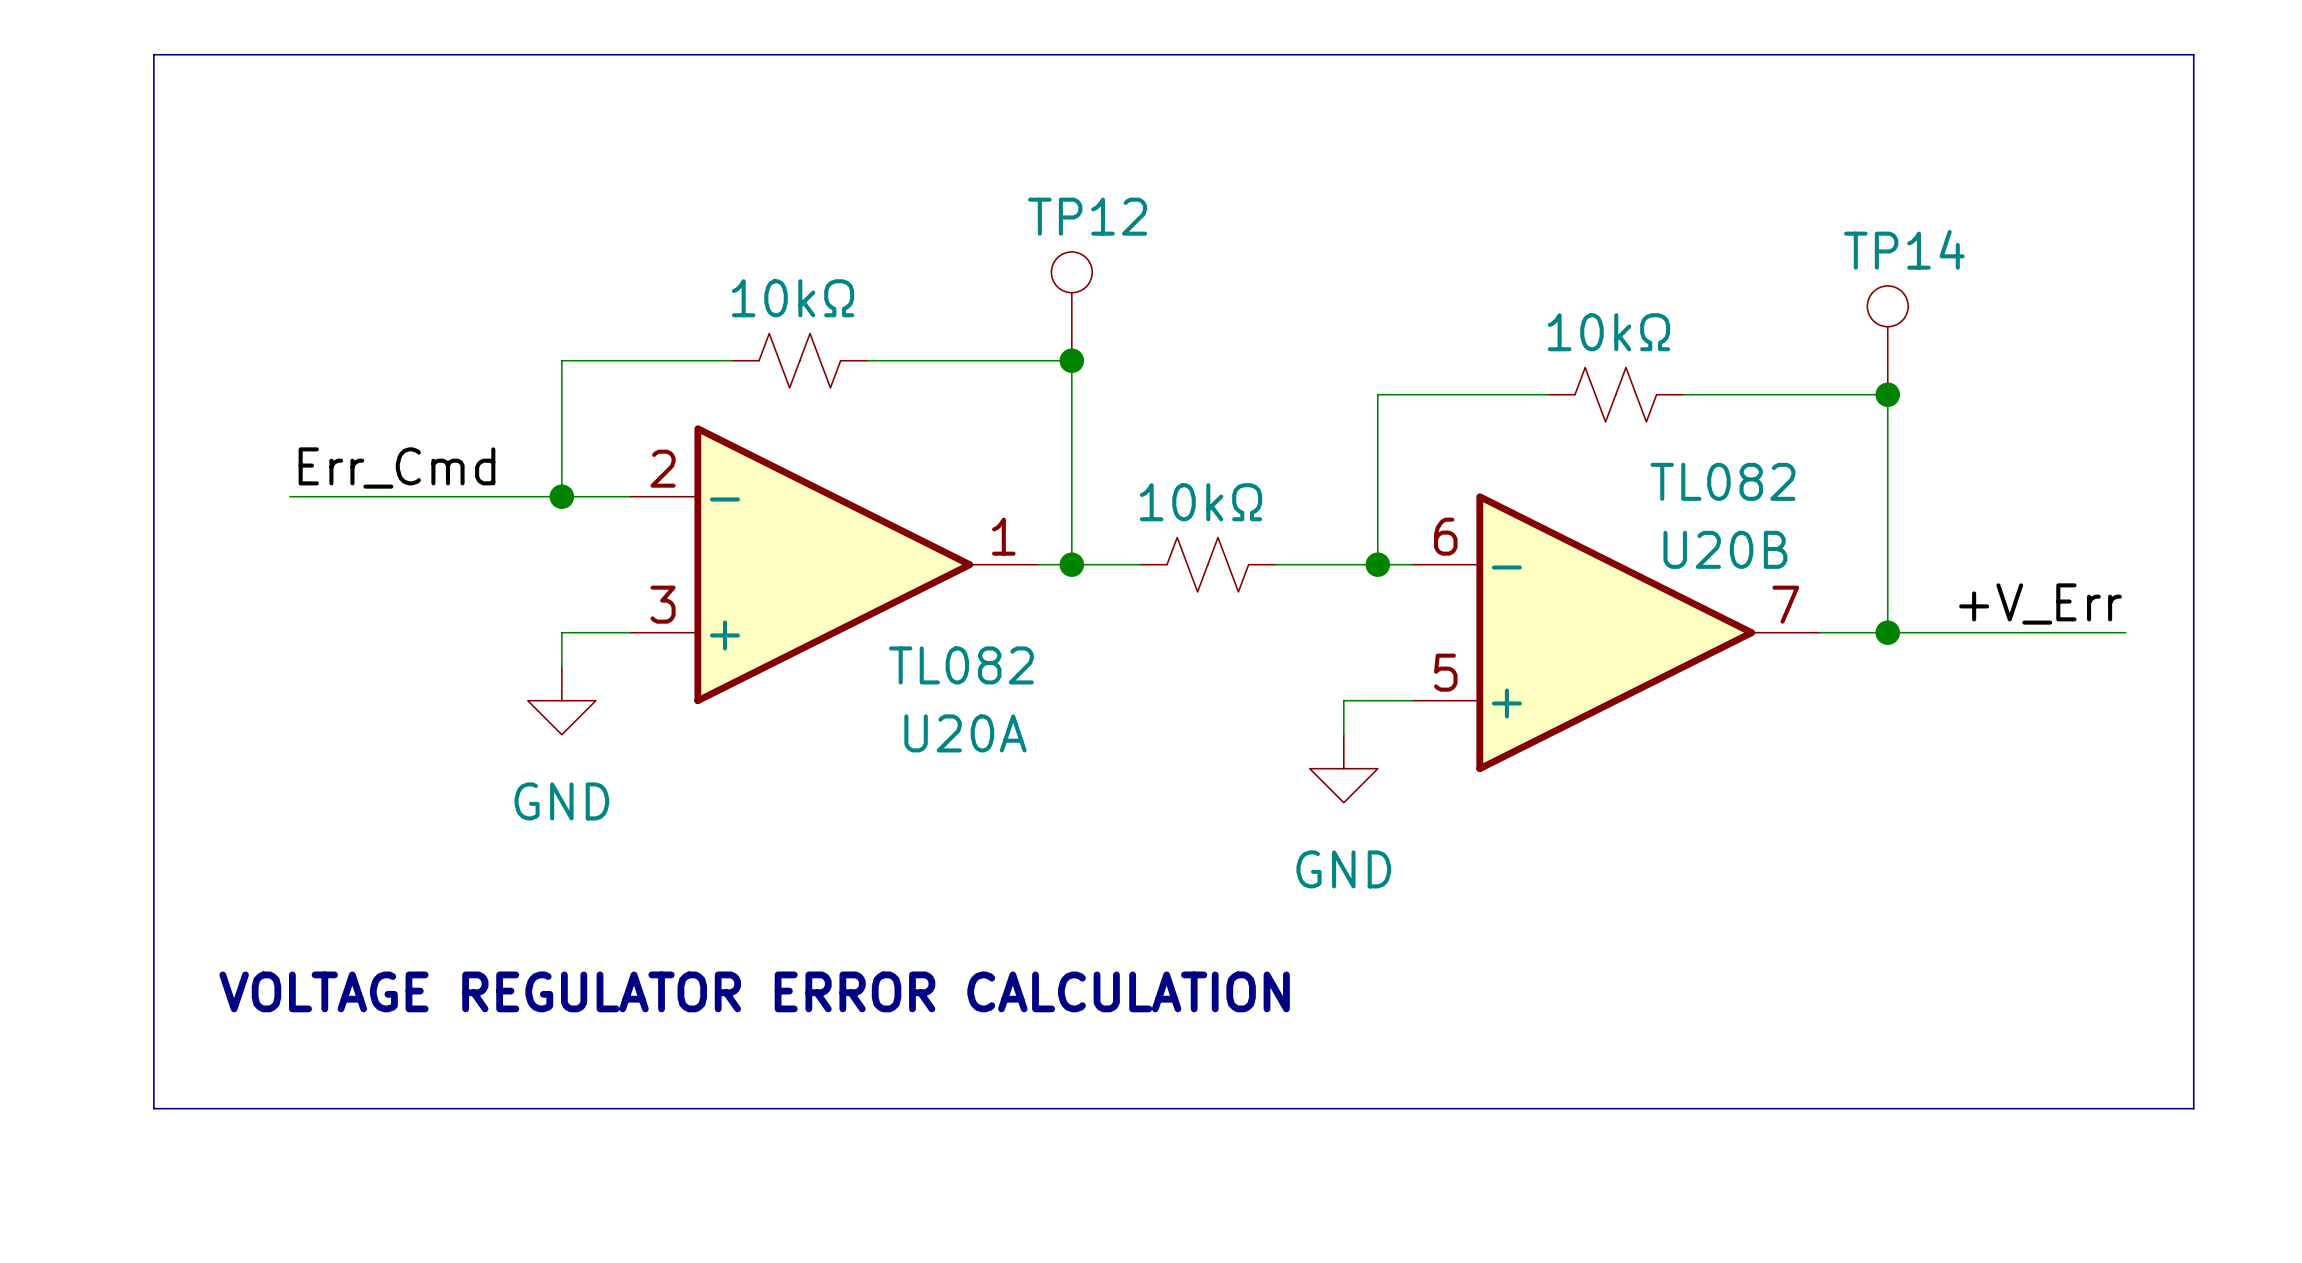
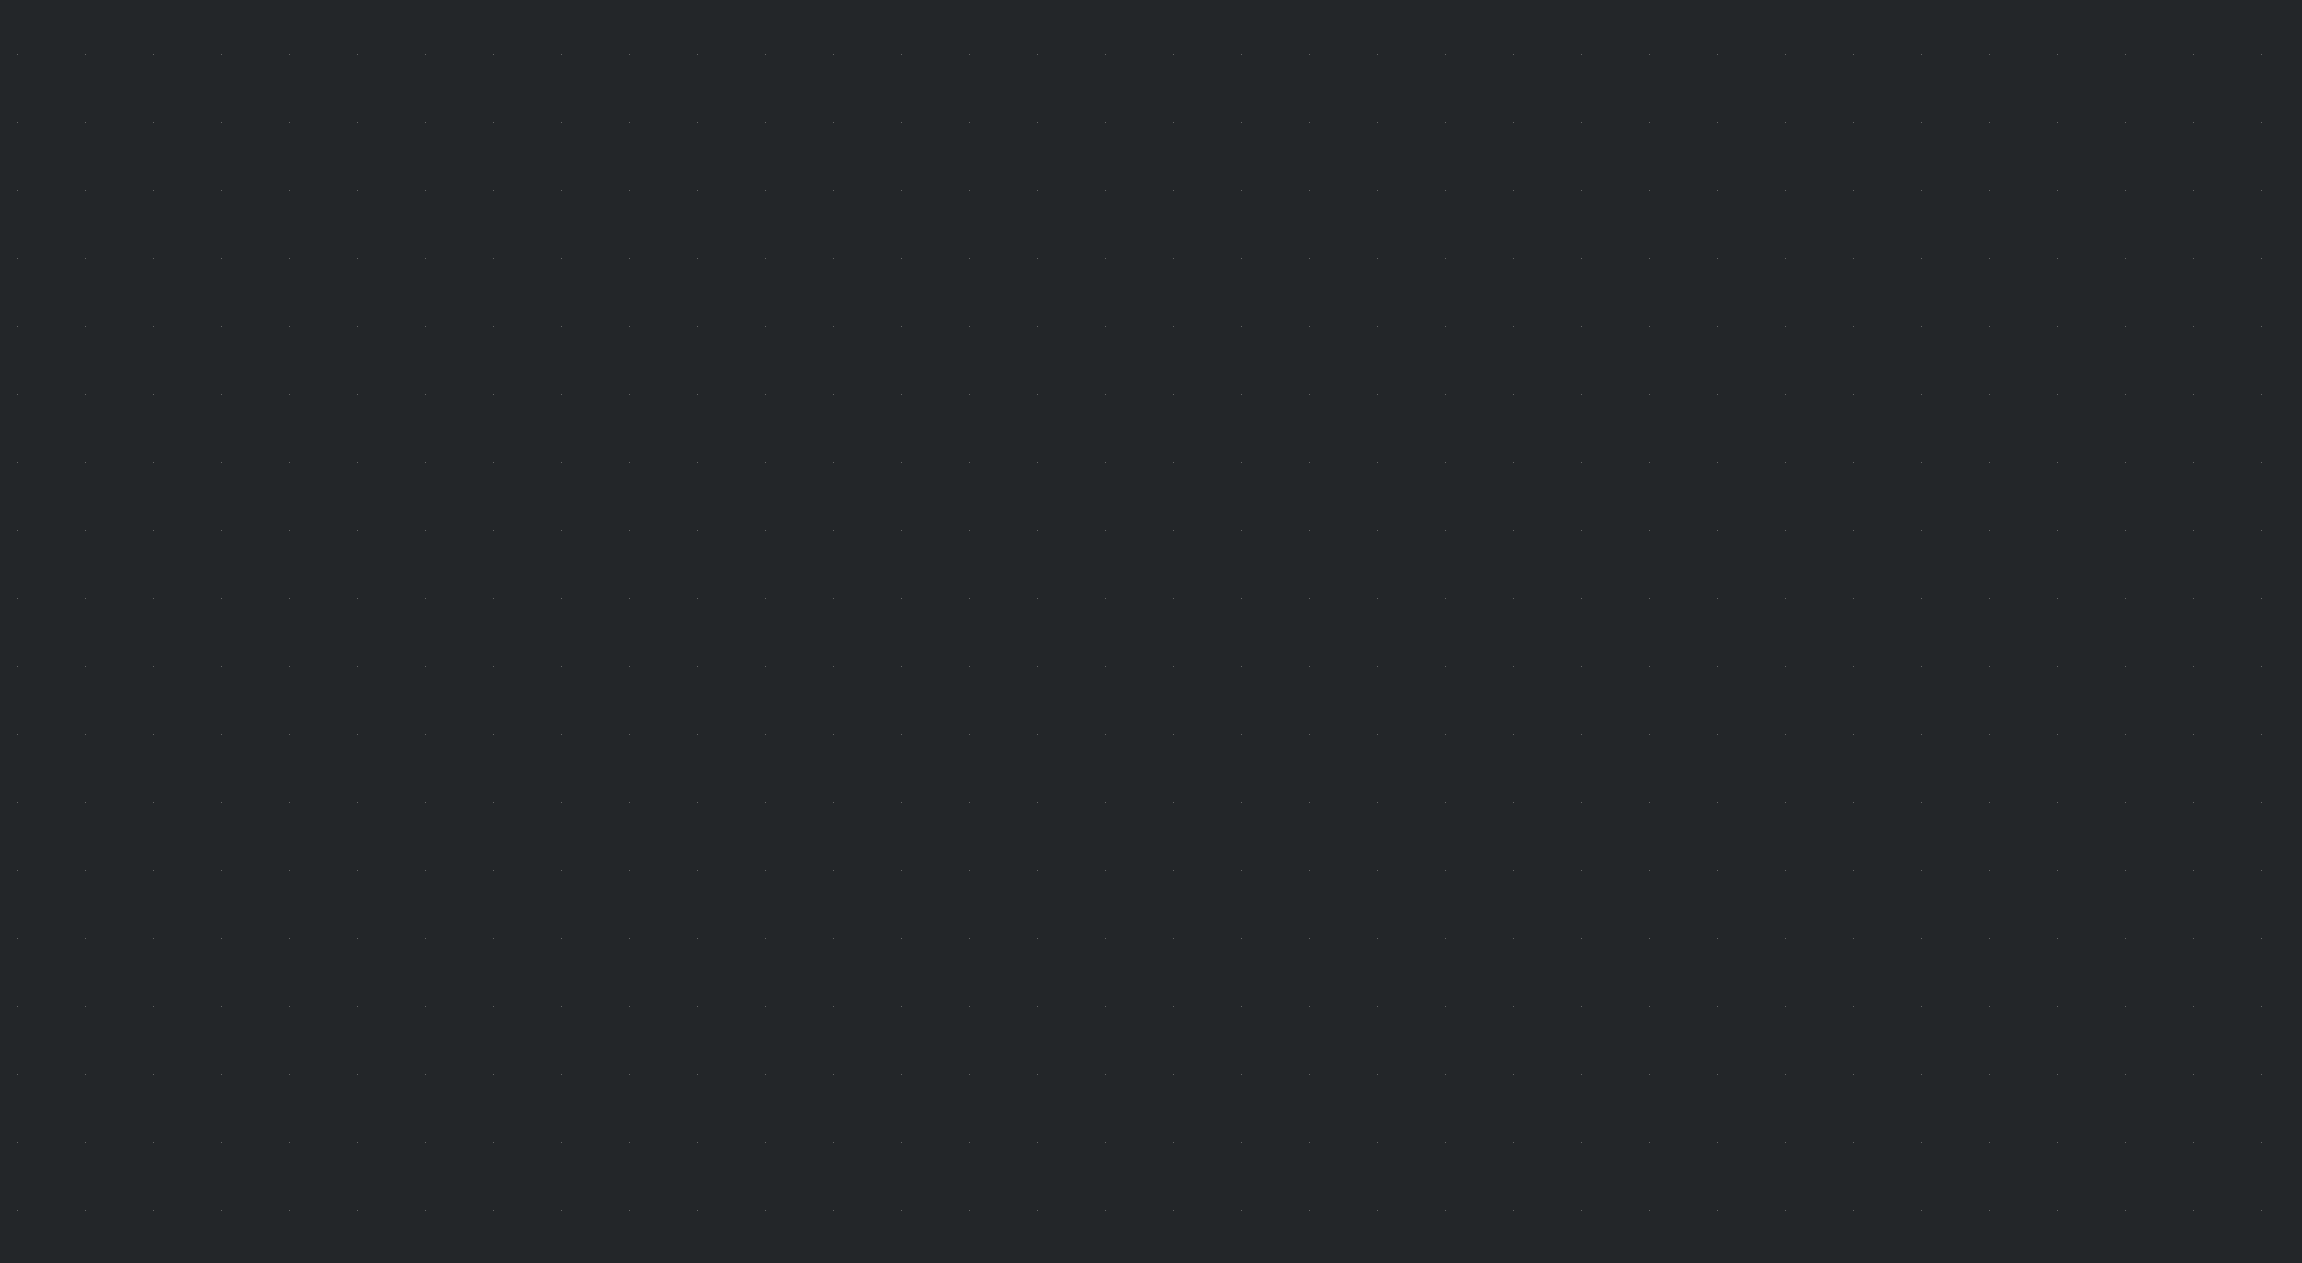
line: (153, 54) (2193, 54) (2193, 1108) (153, 1108) (153, 54) -> none
TP12: (1071, 306) -> none
TP14: (1887, 340) -> none
wire: (731, 360) (561, 360) (561, 496) -> none
part: 10kΩ (799, 360) -> none
wire: (867, 360) (1071, 360) (1071, 564) -> none
junction: (1071, 360) -> none
wire: (1547, 394) (1377, 394) (1377, 564) -> none
part: 10kΩ (1615, 394) -> none
wire: (1683, 394) (1887, 394) (1887, 632) -> none
junction: (1887, 394) -> none
label: Err_Cmd (396, 467) -> none
wire: (289, 496) (629, 496) -> none
junction: (561, 496) -> none
U20A: TL082 (833, 564) -> none
wire: (1037, 564) (1139, 564) -> none
junction: (1071, 564) -> none
part: 10kΩ (1207, 564) -> none
wire: (1275, 564) (1411, 564) -> none
junction: (1377, 564) -> none
label: +V_Err (2040, 603) -> none
wire: (629, 632) (561, 632) (561, 666) -> none
U20B: TL082 (1615, 632) -> none
wire: (1819, 632) (2125, 632) -> none
junction: (1887, 632) -> none
power symbol: GND (561, 700) -> none
wire: (1411, 700) (1343, 700) (1343, 734) -> none
power symbol: GND (1343, 768) -> none
text: VOLTAGE REGULATOR ERROR CALCULATION (754, 991) -> none

